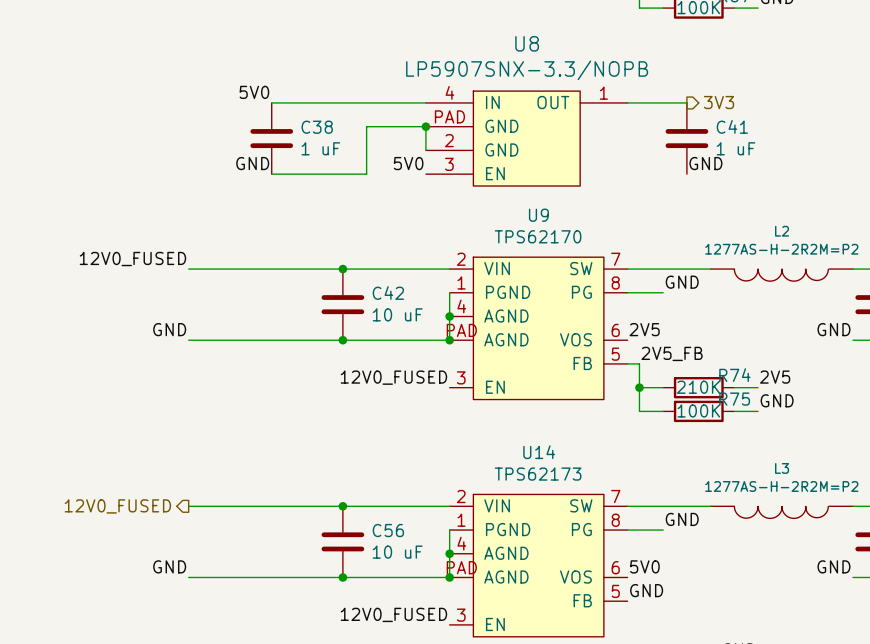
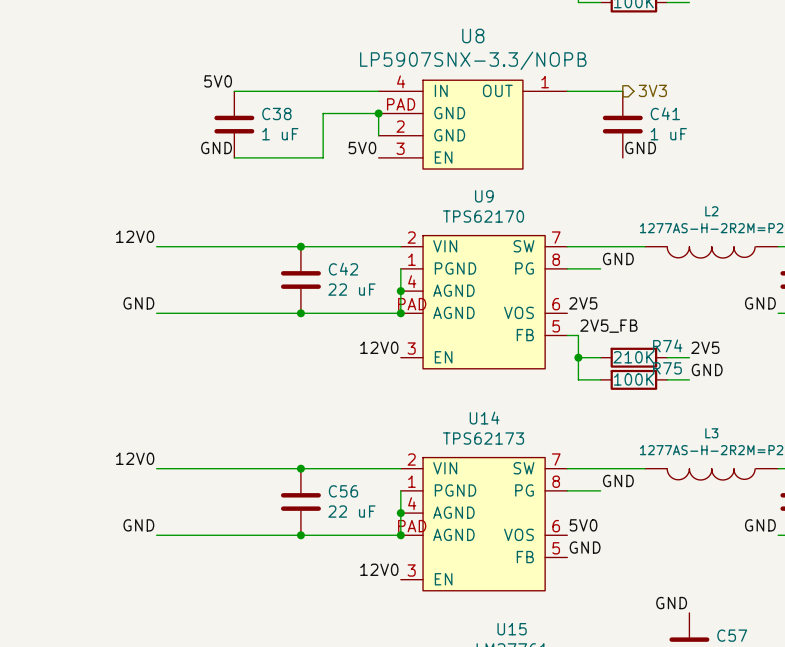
label: 12V0_FUSED (132, 259) -> 12V0 (135, 236)
C42 value: 10 uF (397, 314) -> 22 uF (351, 289)
label: 12V0_FUSED (393, 377) -> 12V0 (379, 347)
label: none -> 12V0 (135, 458)
hierarchical label: 12V0_FUSED (117, 506) -> none
C56 value: 10 uF (397, 552) -> 22 uF (351, 511)
label: 12V0_FUSED (393, 614) -> 12V0 (379, 569)

